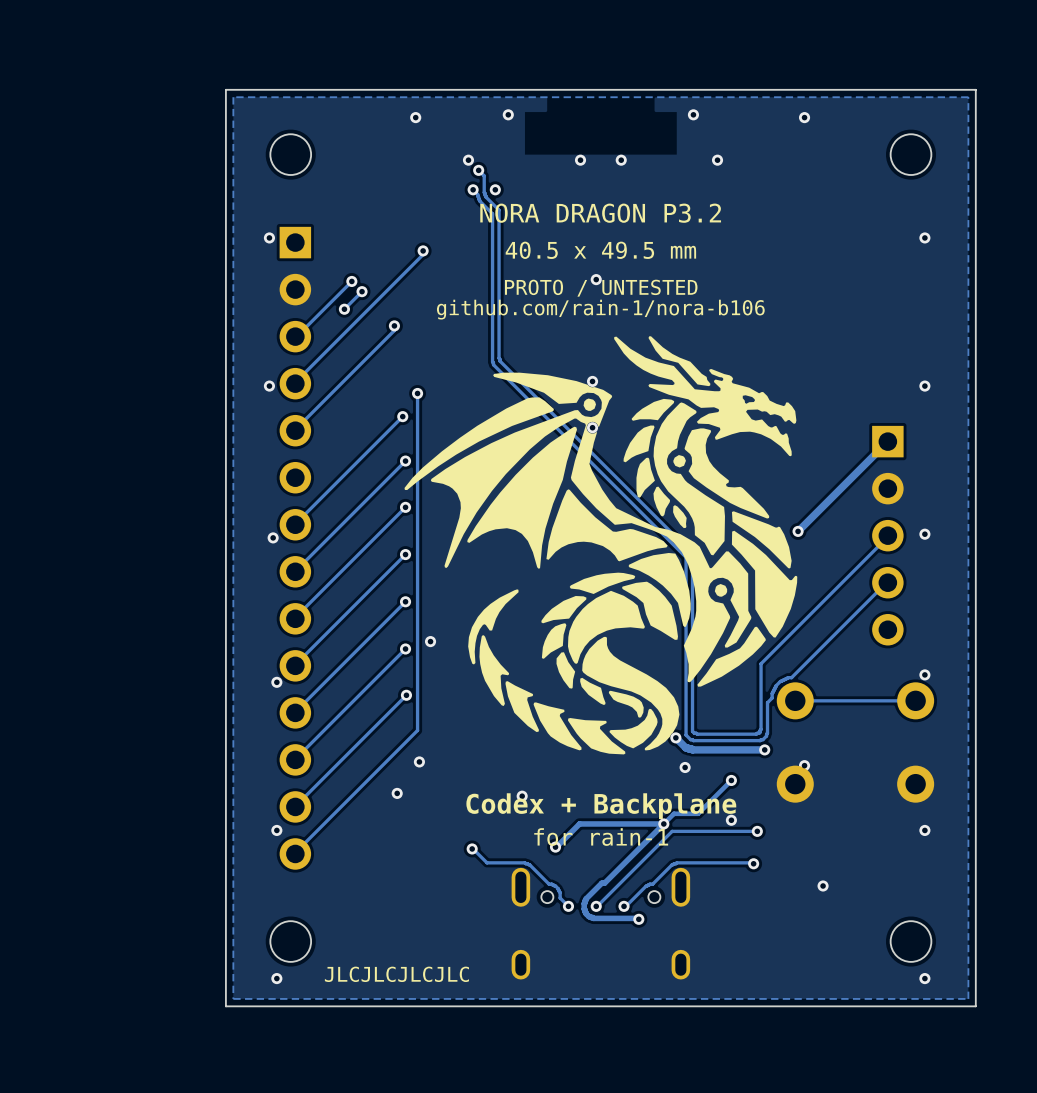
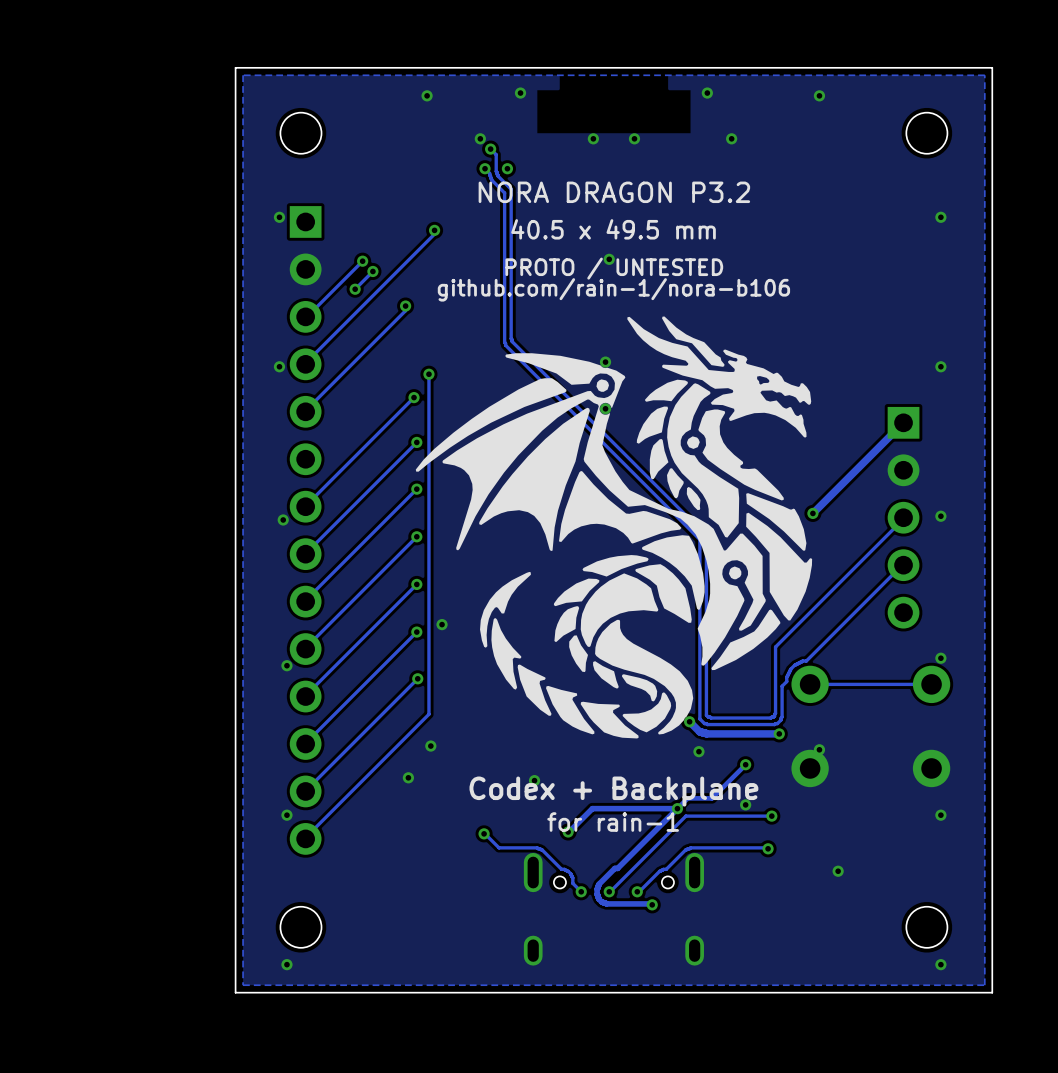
text: JLCJLCJLCJLC (396, 974) -> none

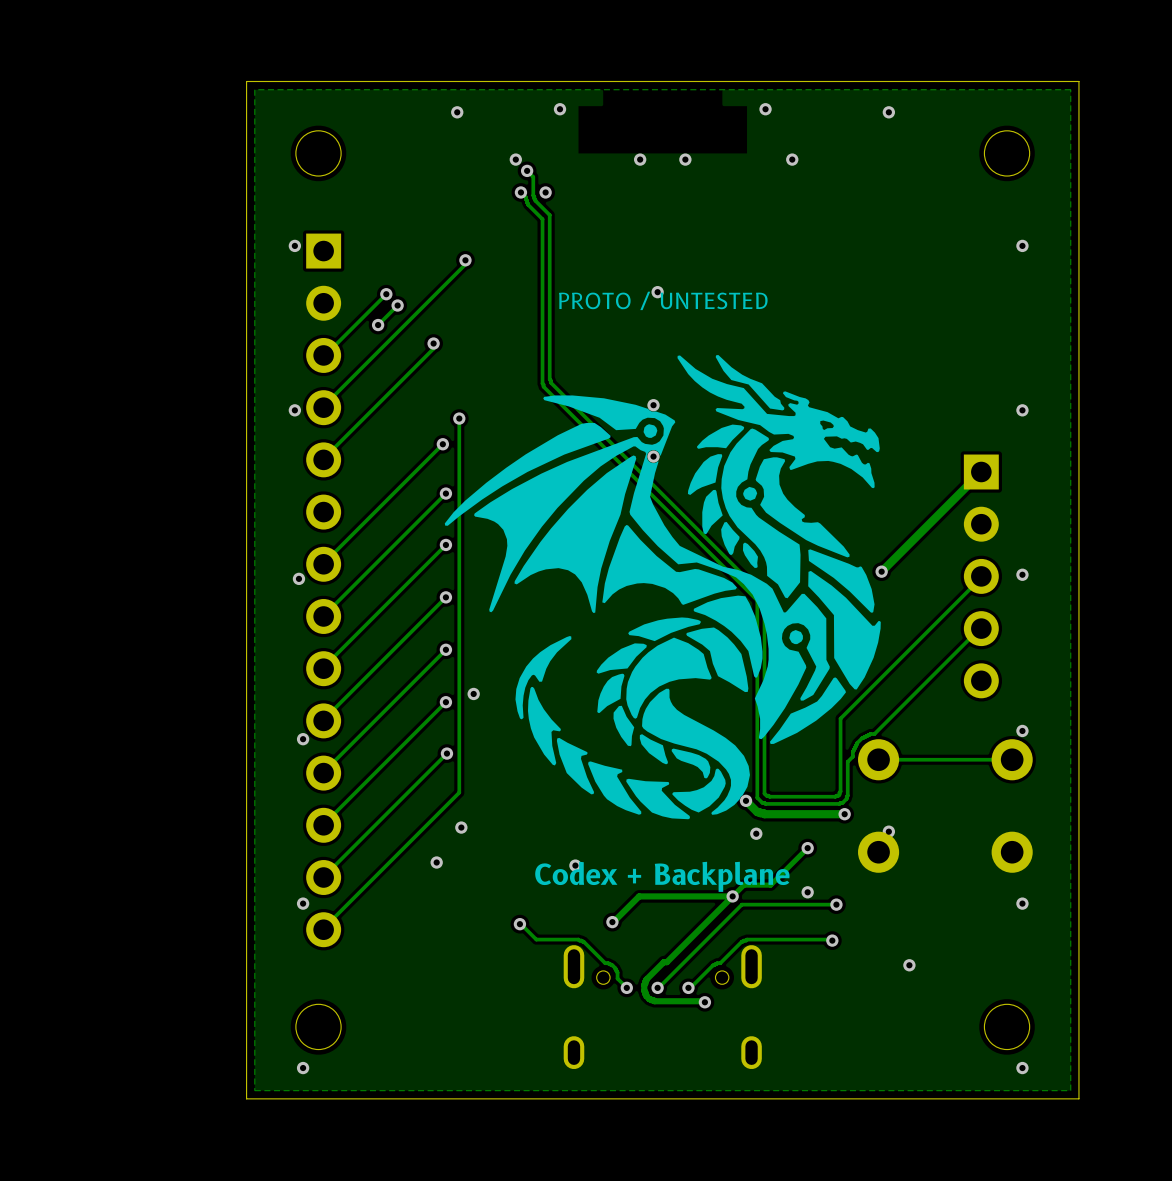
text: NORA DRAGON P3.2 (614, 192) -> none
text: 40.5 x 49.5 mm (613, 229) -> none
text: github.com/rain-1/nora-b106 (613, 289) -> none
text: for rain-1 (613, 822) -> none

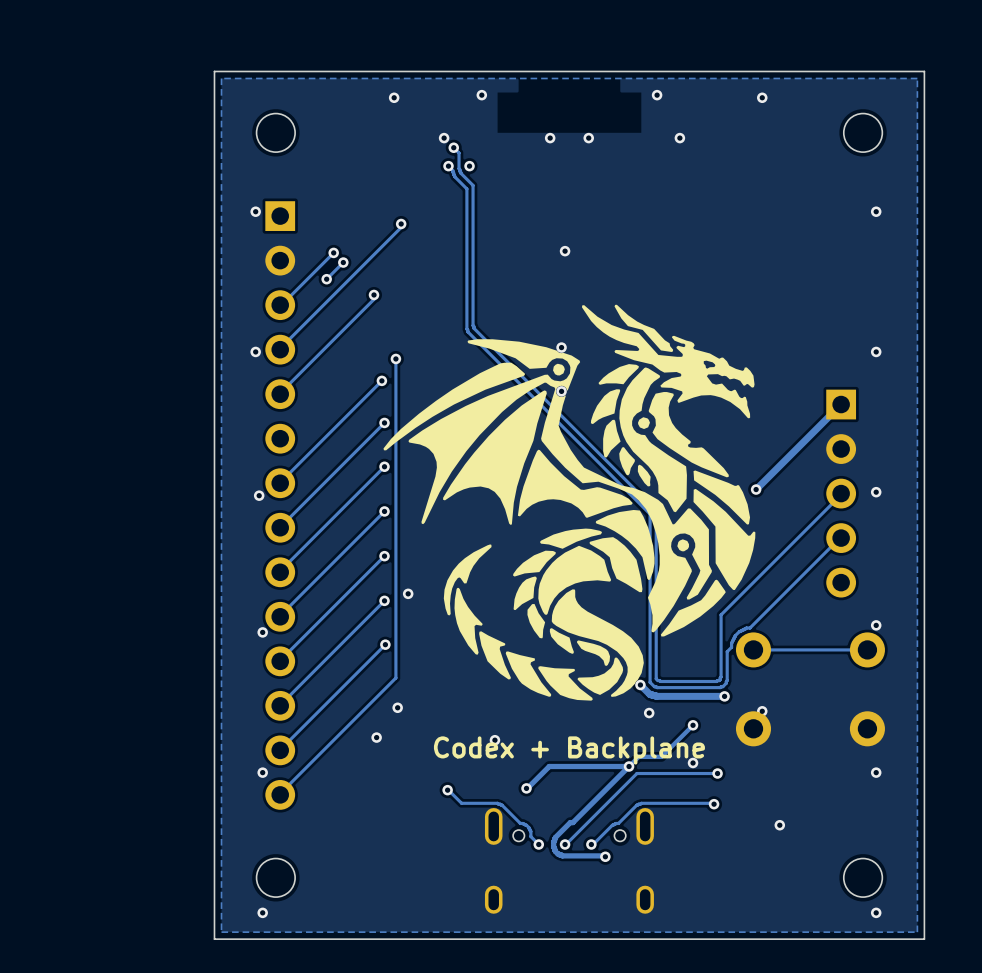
text: PROTO / UNTESTED (663, 300) -> none

